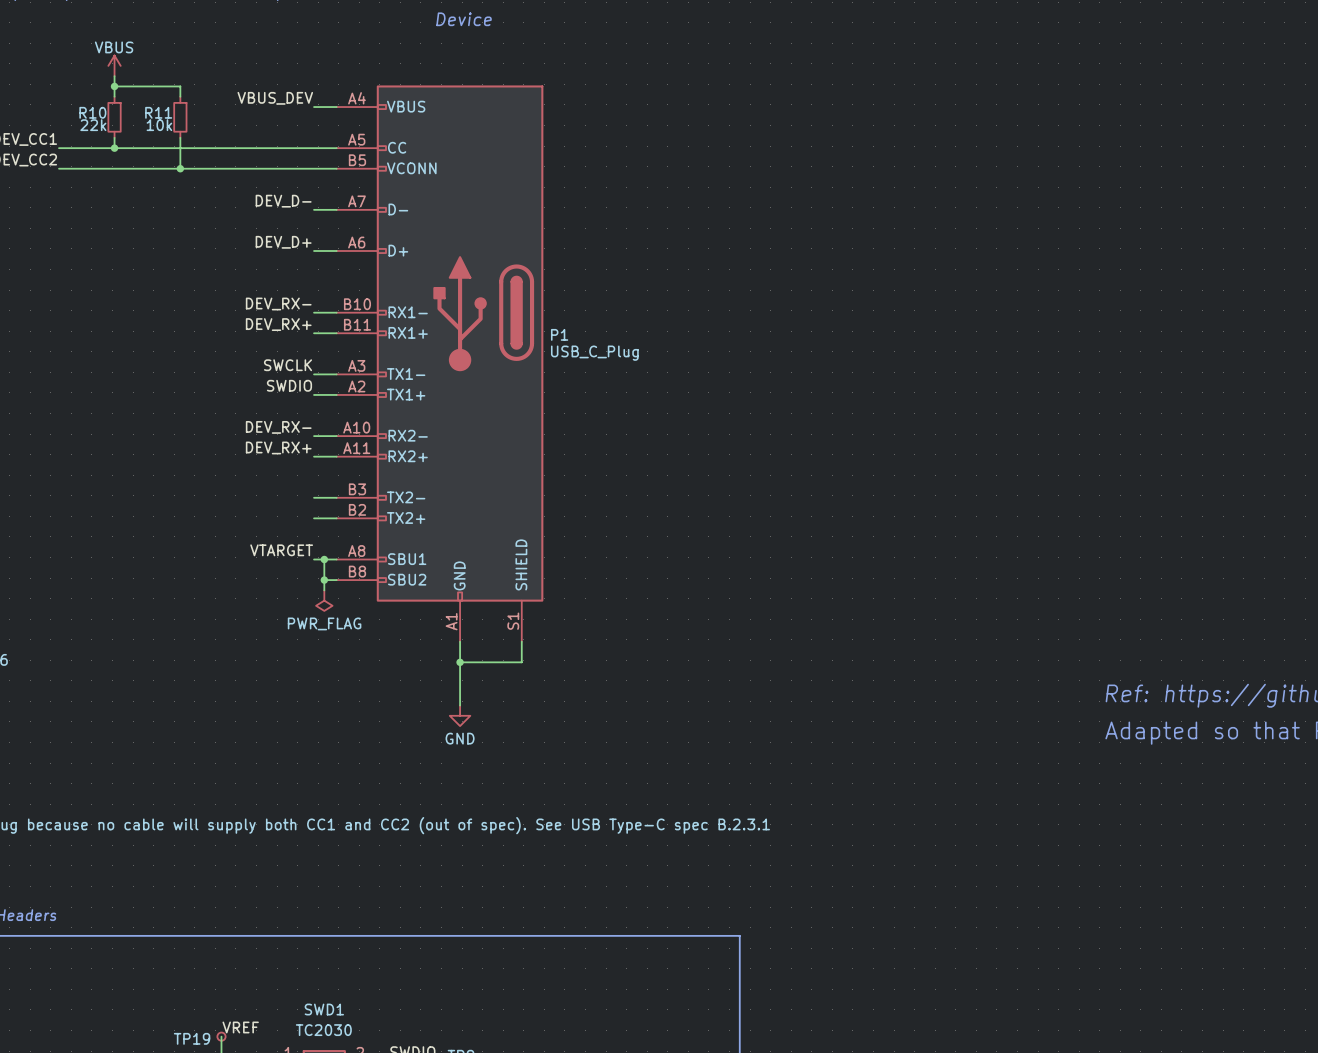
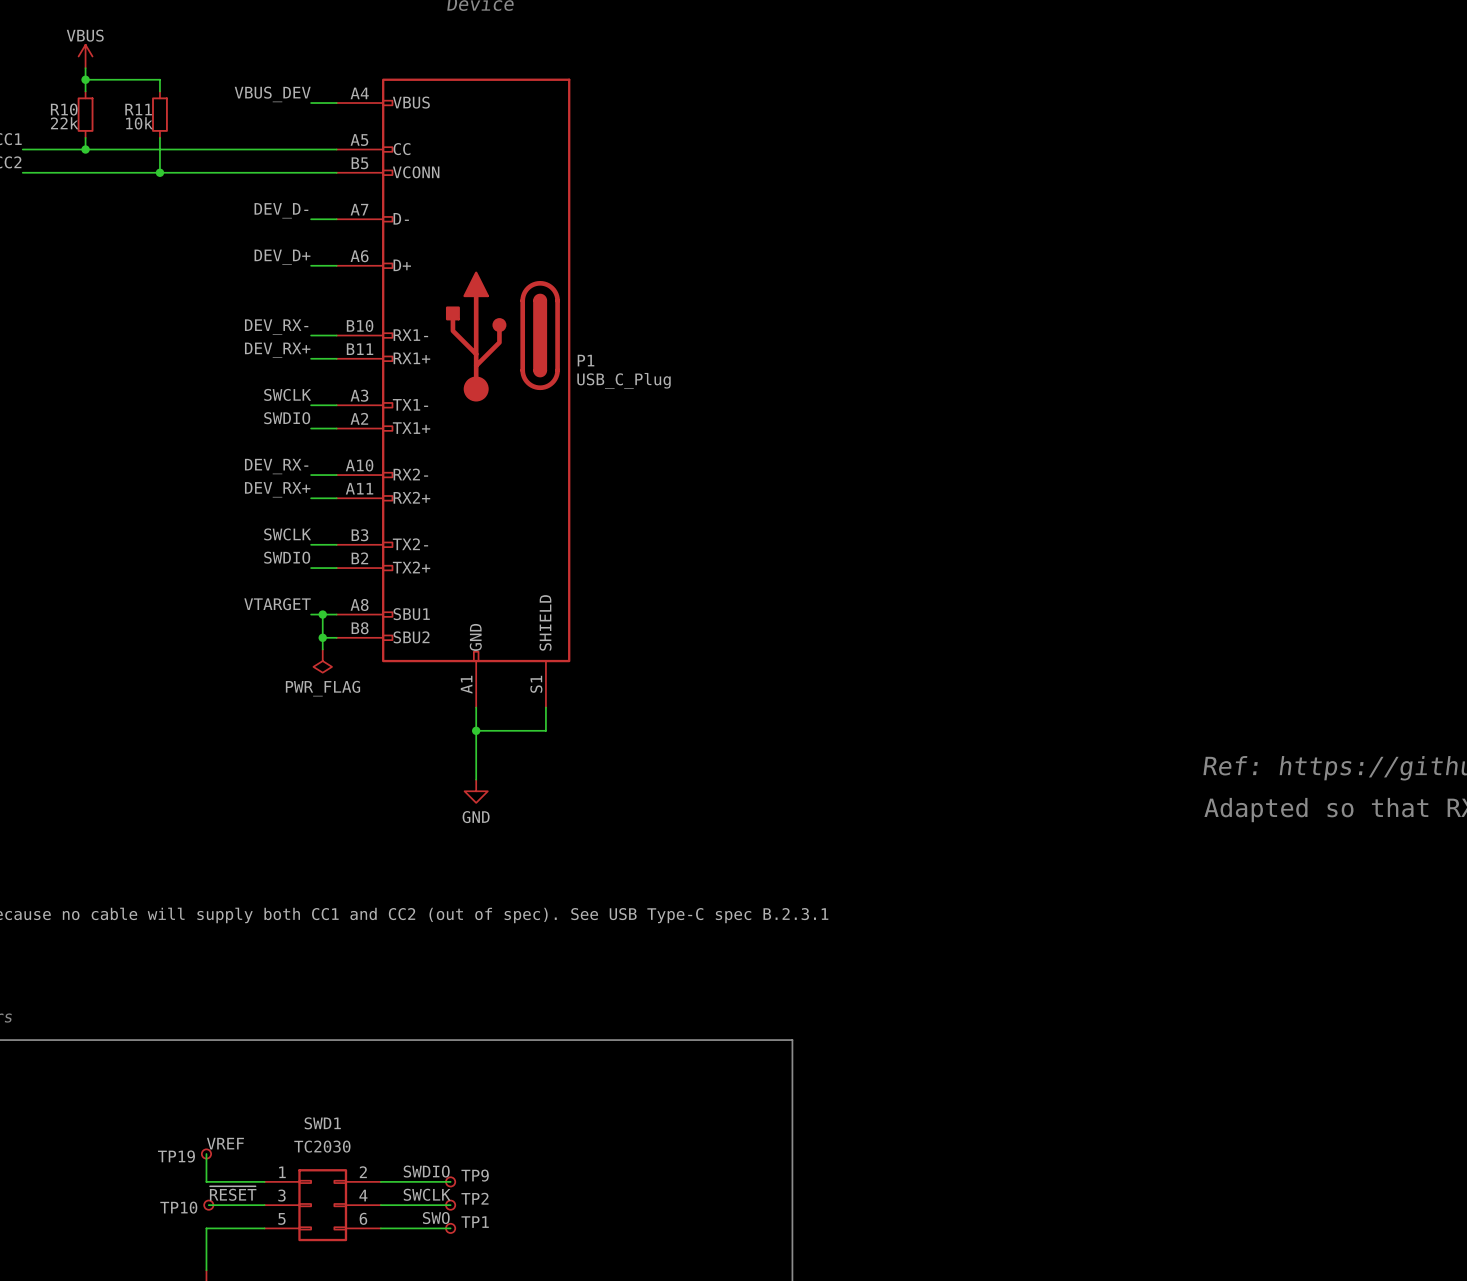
label: none -> SWCLK (287, 534)
label: none -> SWDIO (287, 557)

